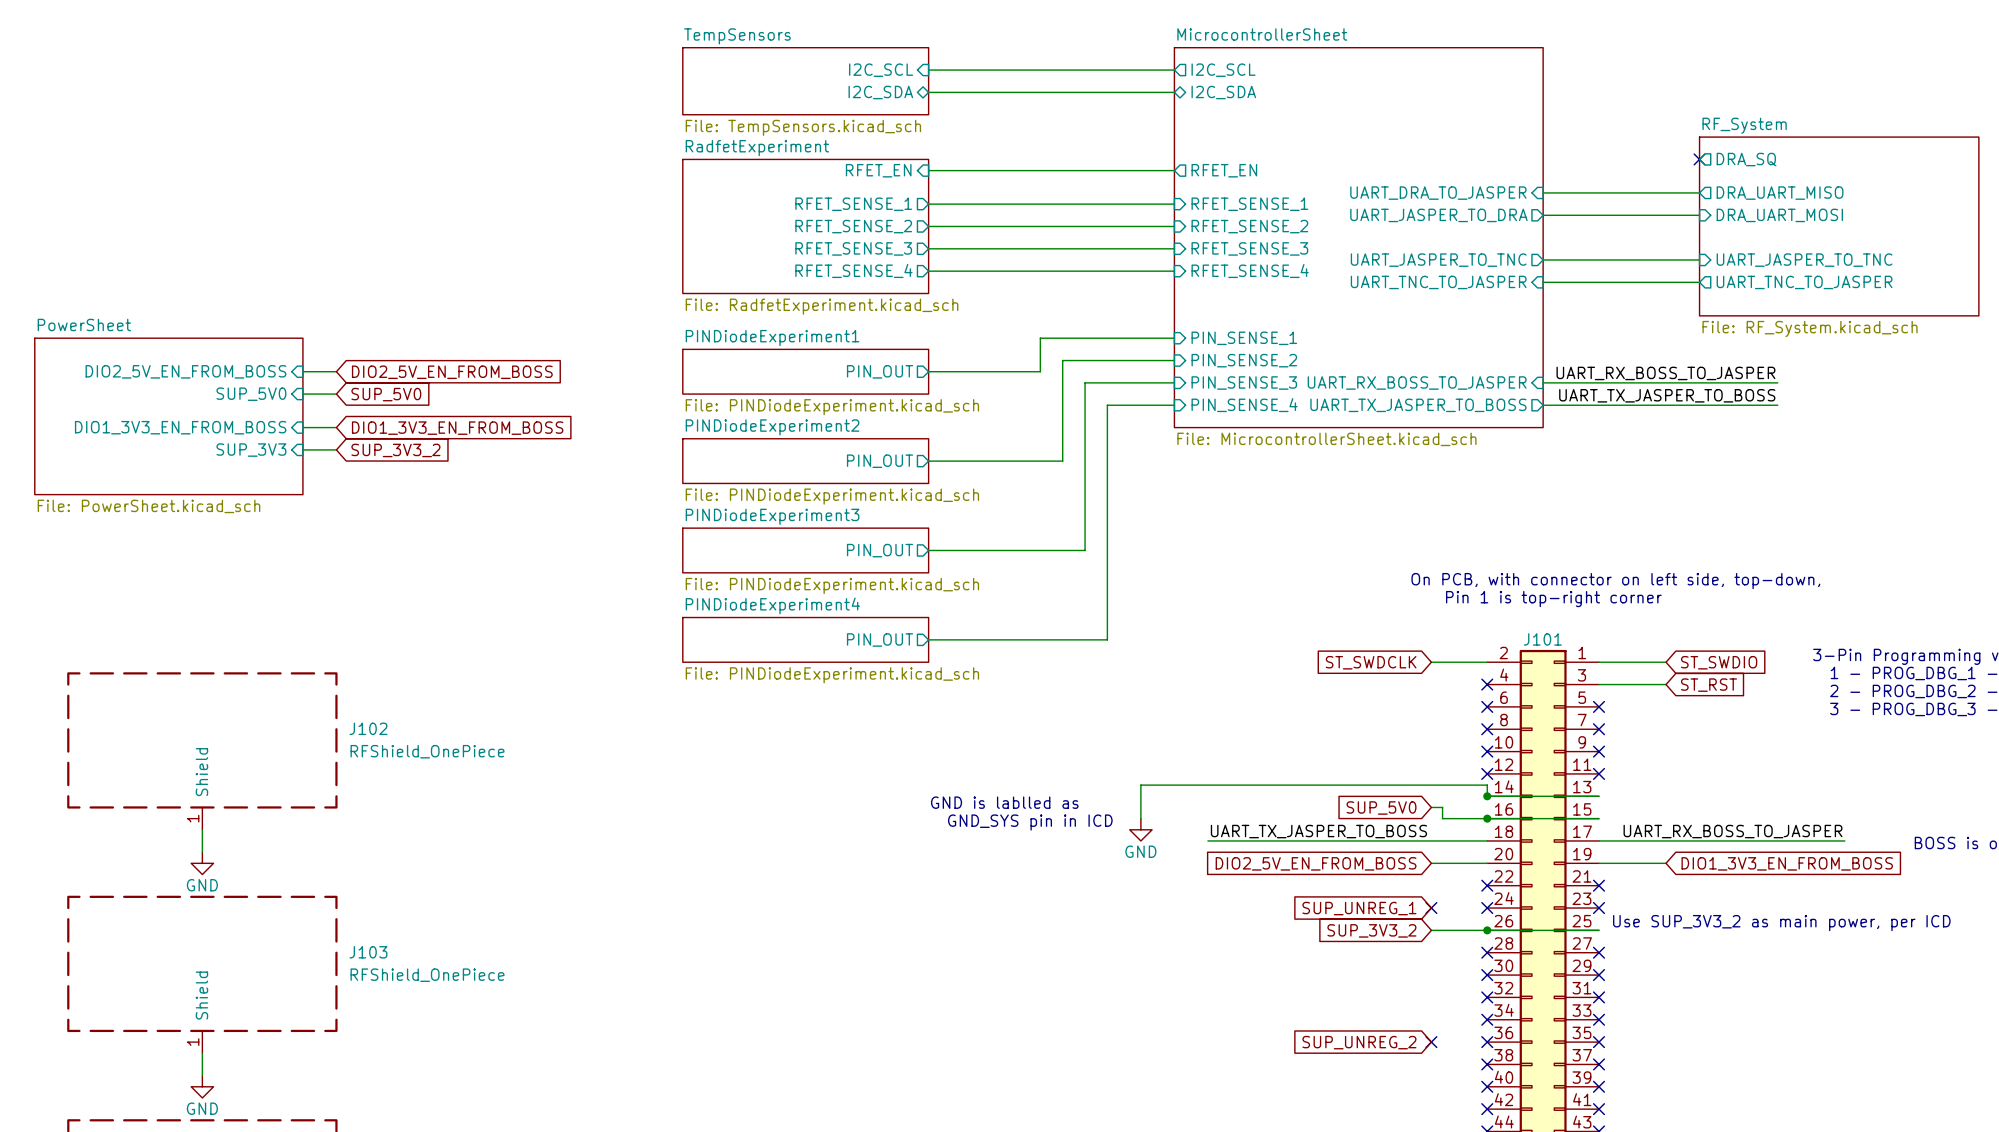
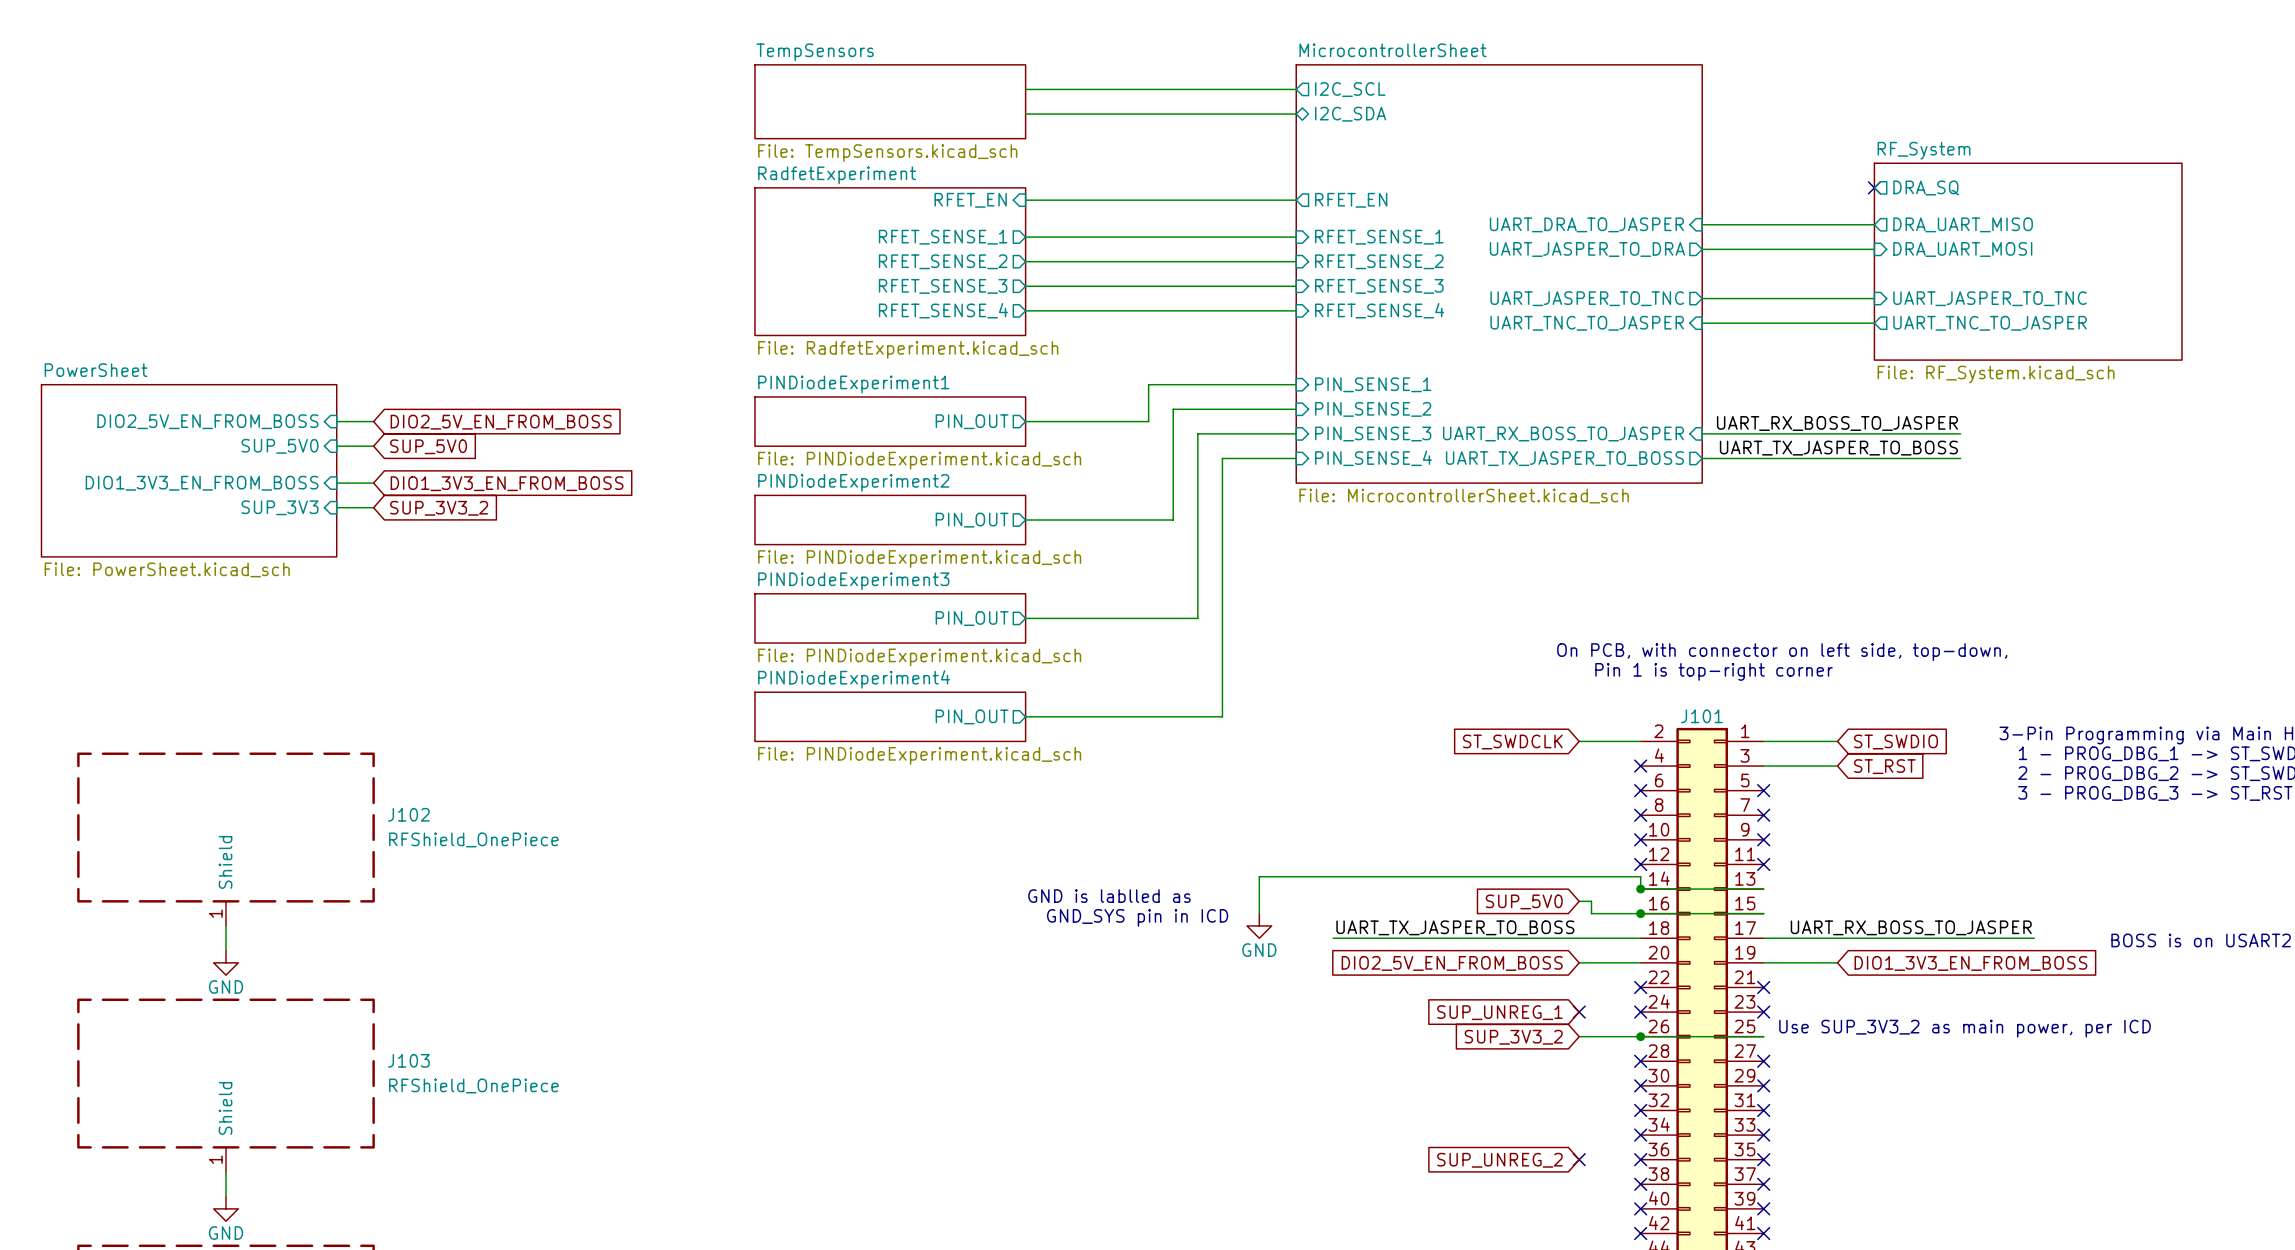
sheet pin: I2C_SCL (881, 70) -> none
sheet pin: I2C_SDA (880, 92) -> none

